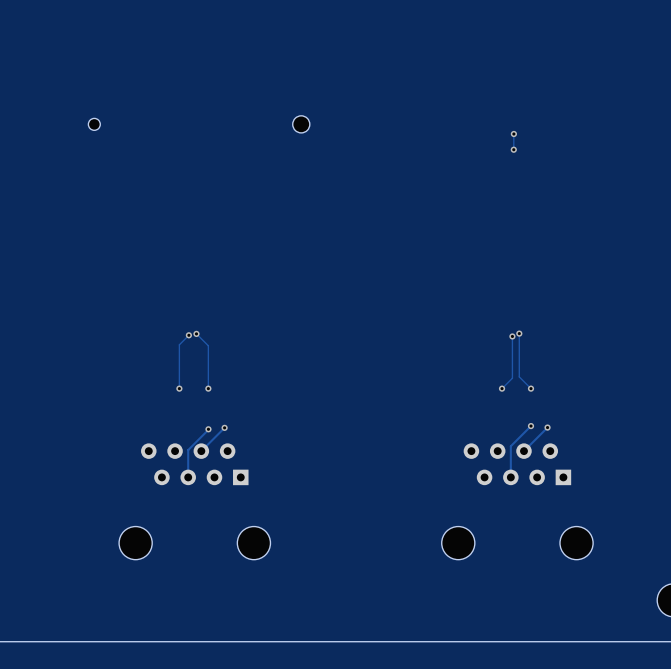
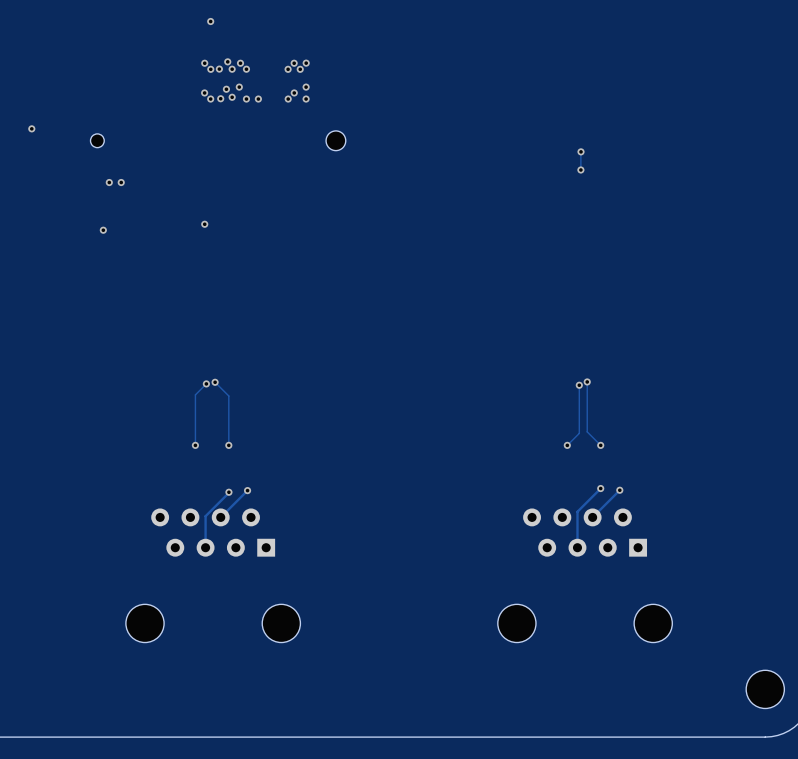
via: none -> (210, 21)
via: none -> (227, 61)
via: none -> (204, 63)
via: none -> (240, 63)
via: none -> (294, 63)
via: none -> (306, 63)
via: none -> (210, 69)
via: none -> (219, 69)
via: none -> (232, 69)
via: none -> (246, 69)
via: none -> (288, 69)
via: none -> (300, 69)
via: none -> (239, 87)
via: none -> (306, 87)
via: none -> (226, 89)
via: none -> (204, 92)
via: none -> (294, 92)
via: none -> (232, 97)
via: none -> (220, 98)
via: none -> (210, 99)
via: none -> (246, 99)
via: none -> (258, 99)
via: none -> (288, 99)
via: none -> (306, 99)
via: none -> (31, 128)
via: none -> (109, 182)
via: none -> (121, 182)
via: none -> (204, 224)
via: none -> (103, 230)

